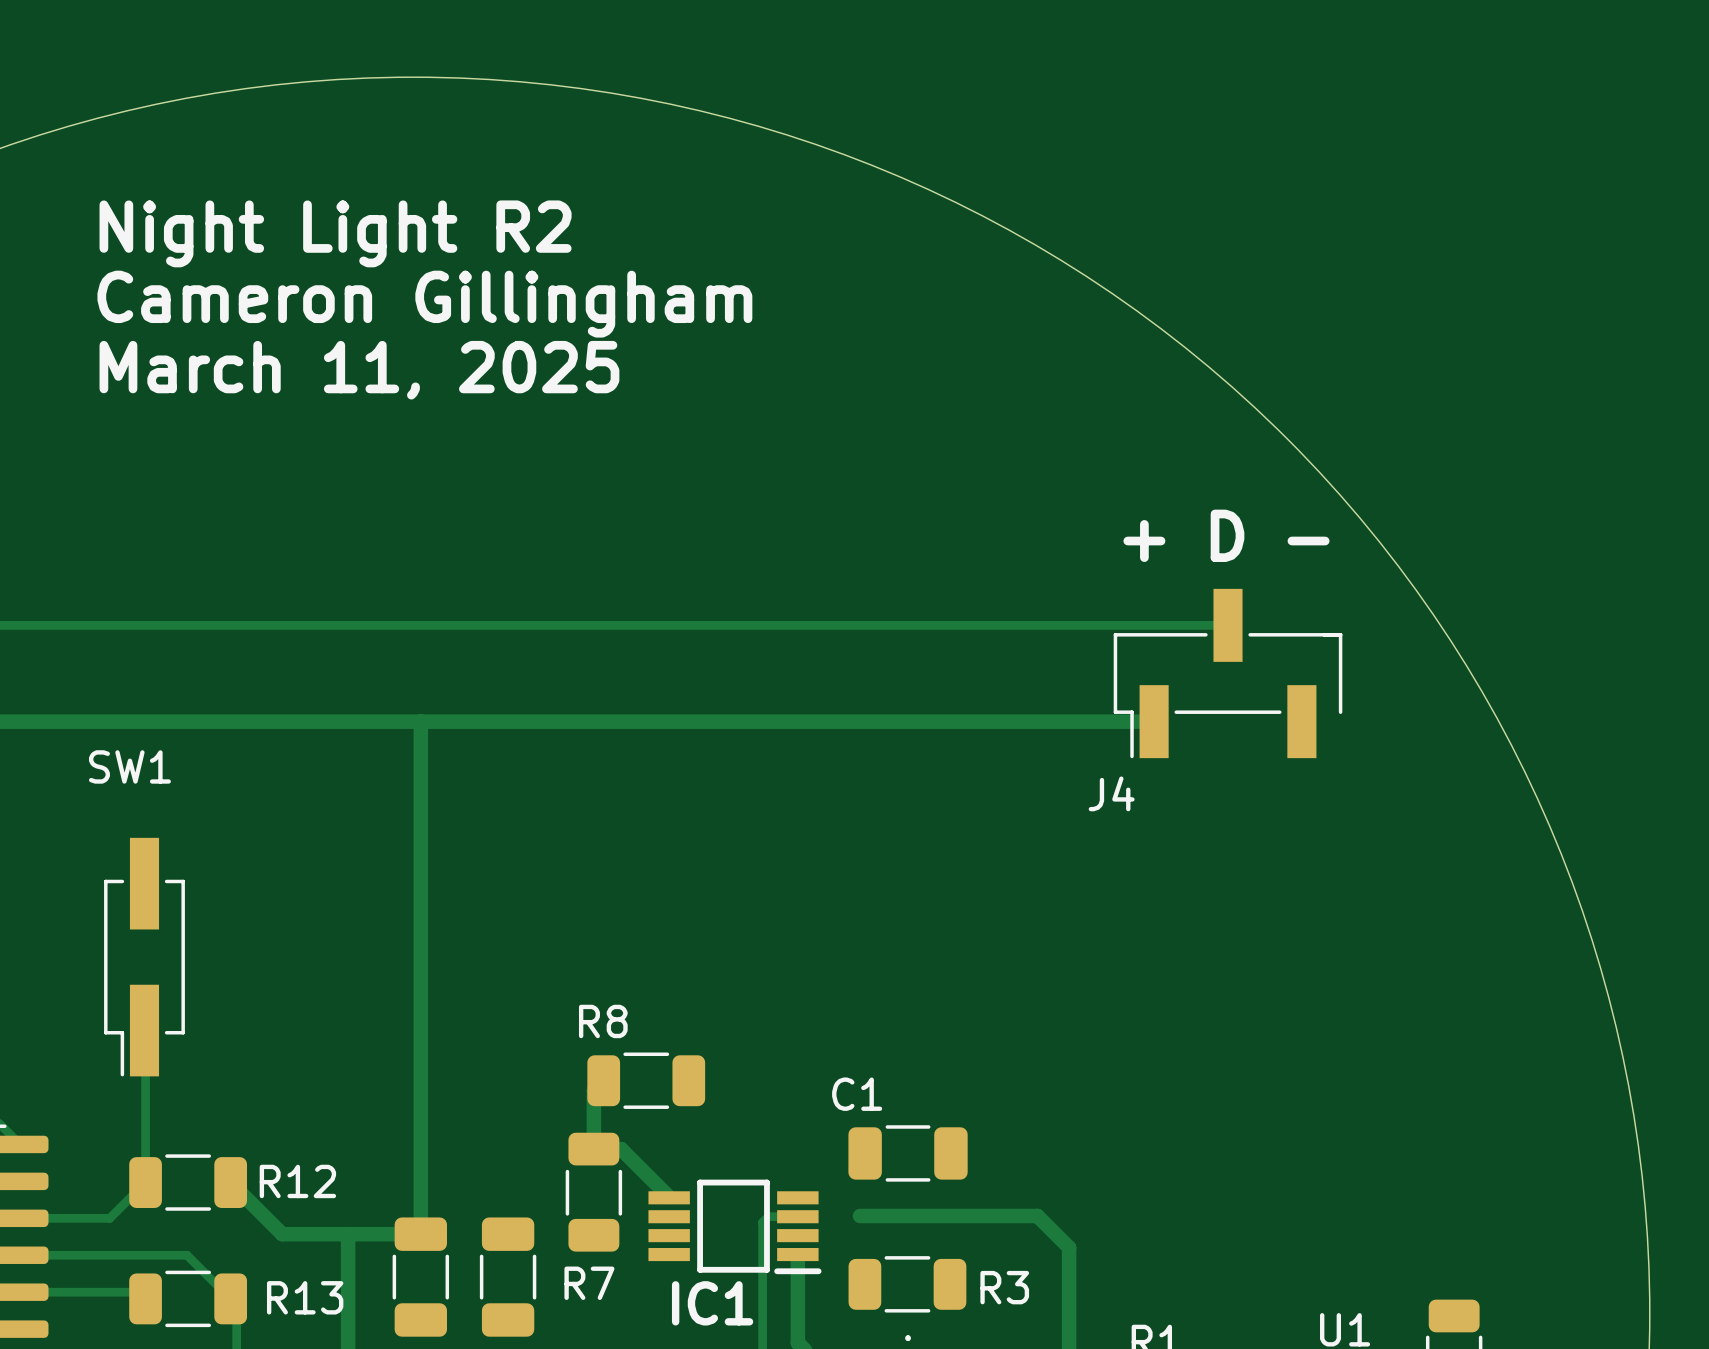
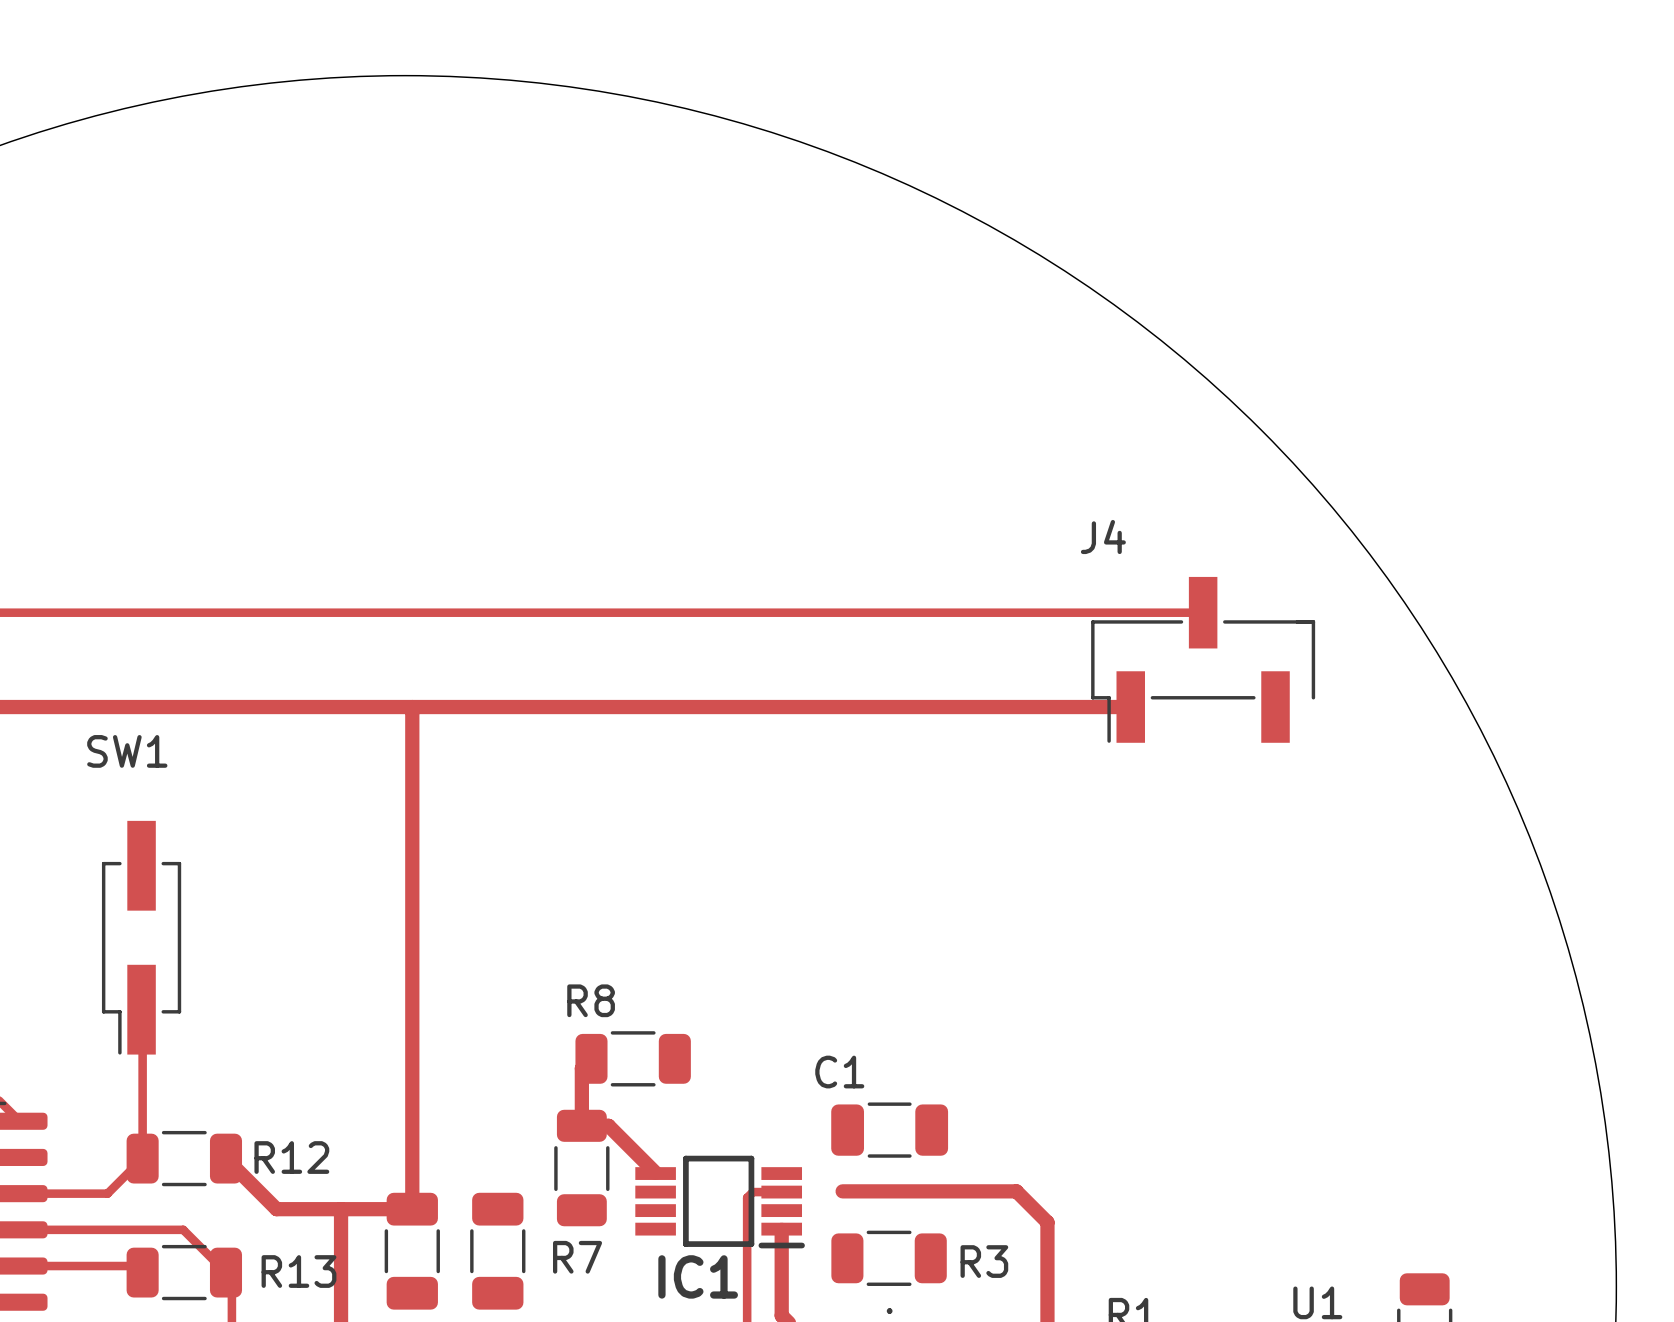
text: Night Light R2 (335, 233) -> none
text: Cameron Gillingham (424, 304) -> none
text: March 11, 2025 (359, 370) -> none
text: + D - (1226, 535) -> none
J4 name position: J4 (1111, 793) -> J4 (1103, 537)

